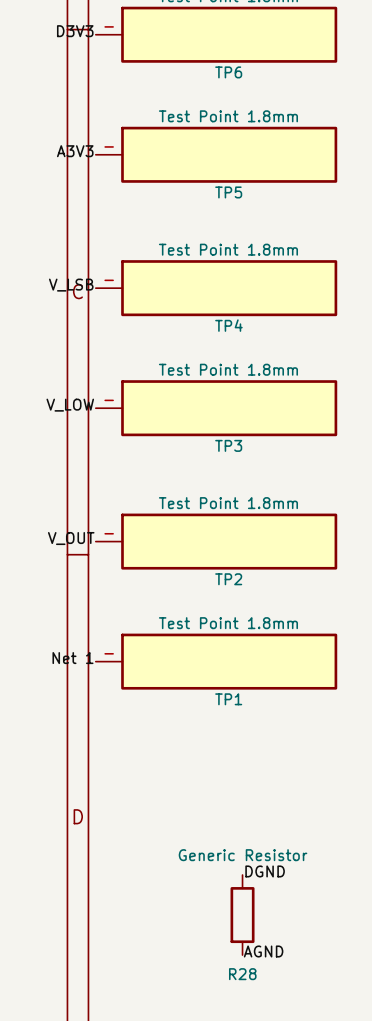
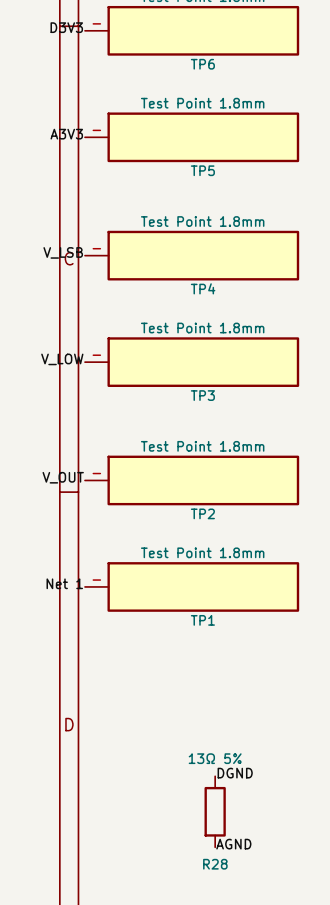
R28 value: Generic Resistor (243, 855) -> 13Ω 5% (215, 758)

